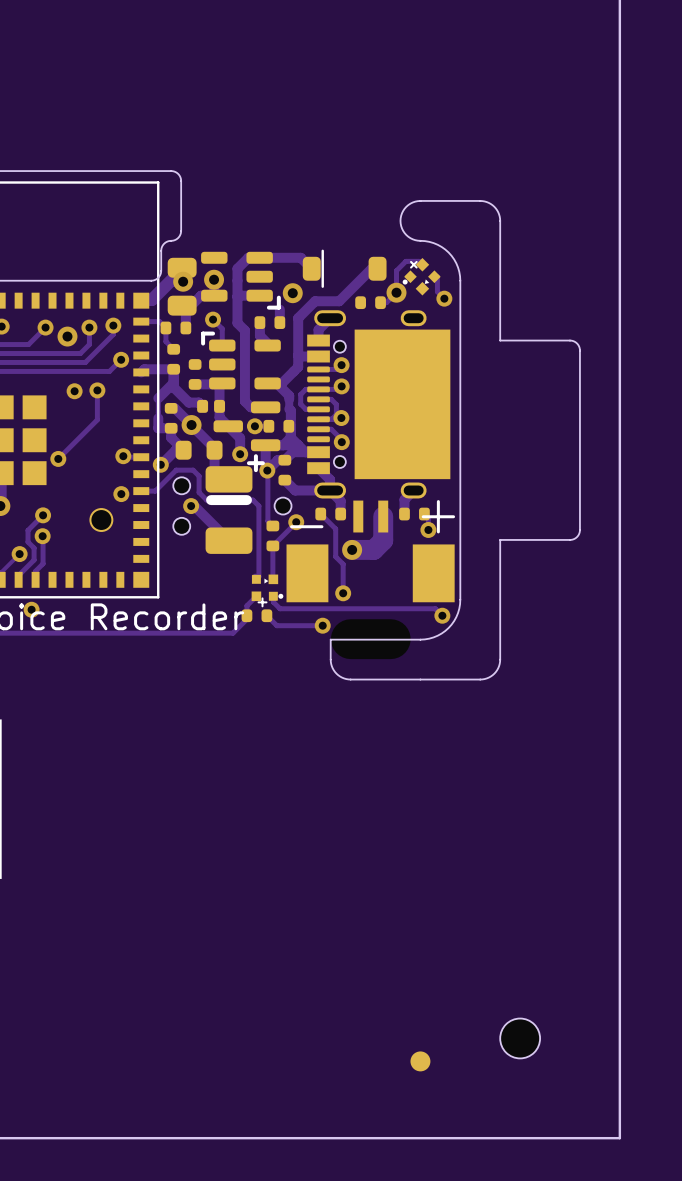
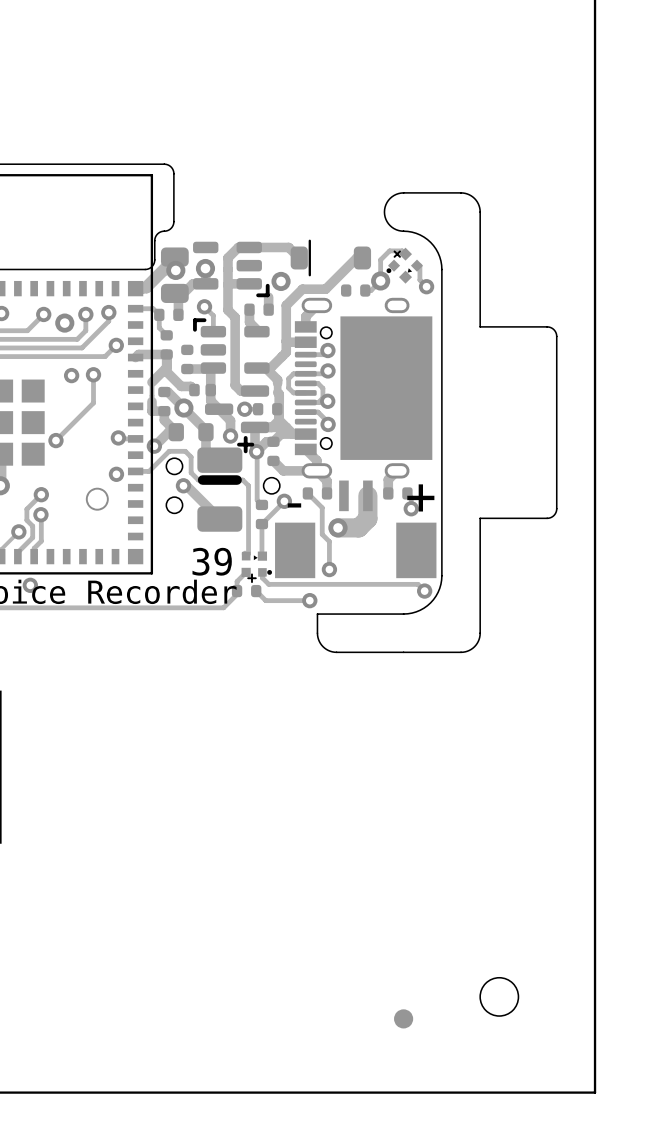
text: none -> 39 (212, 561)

